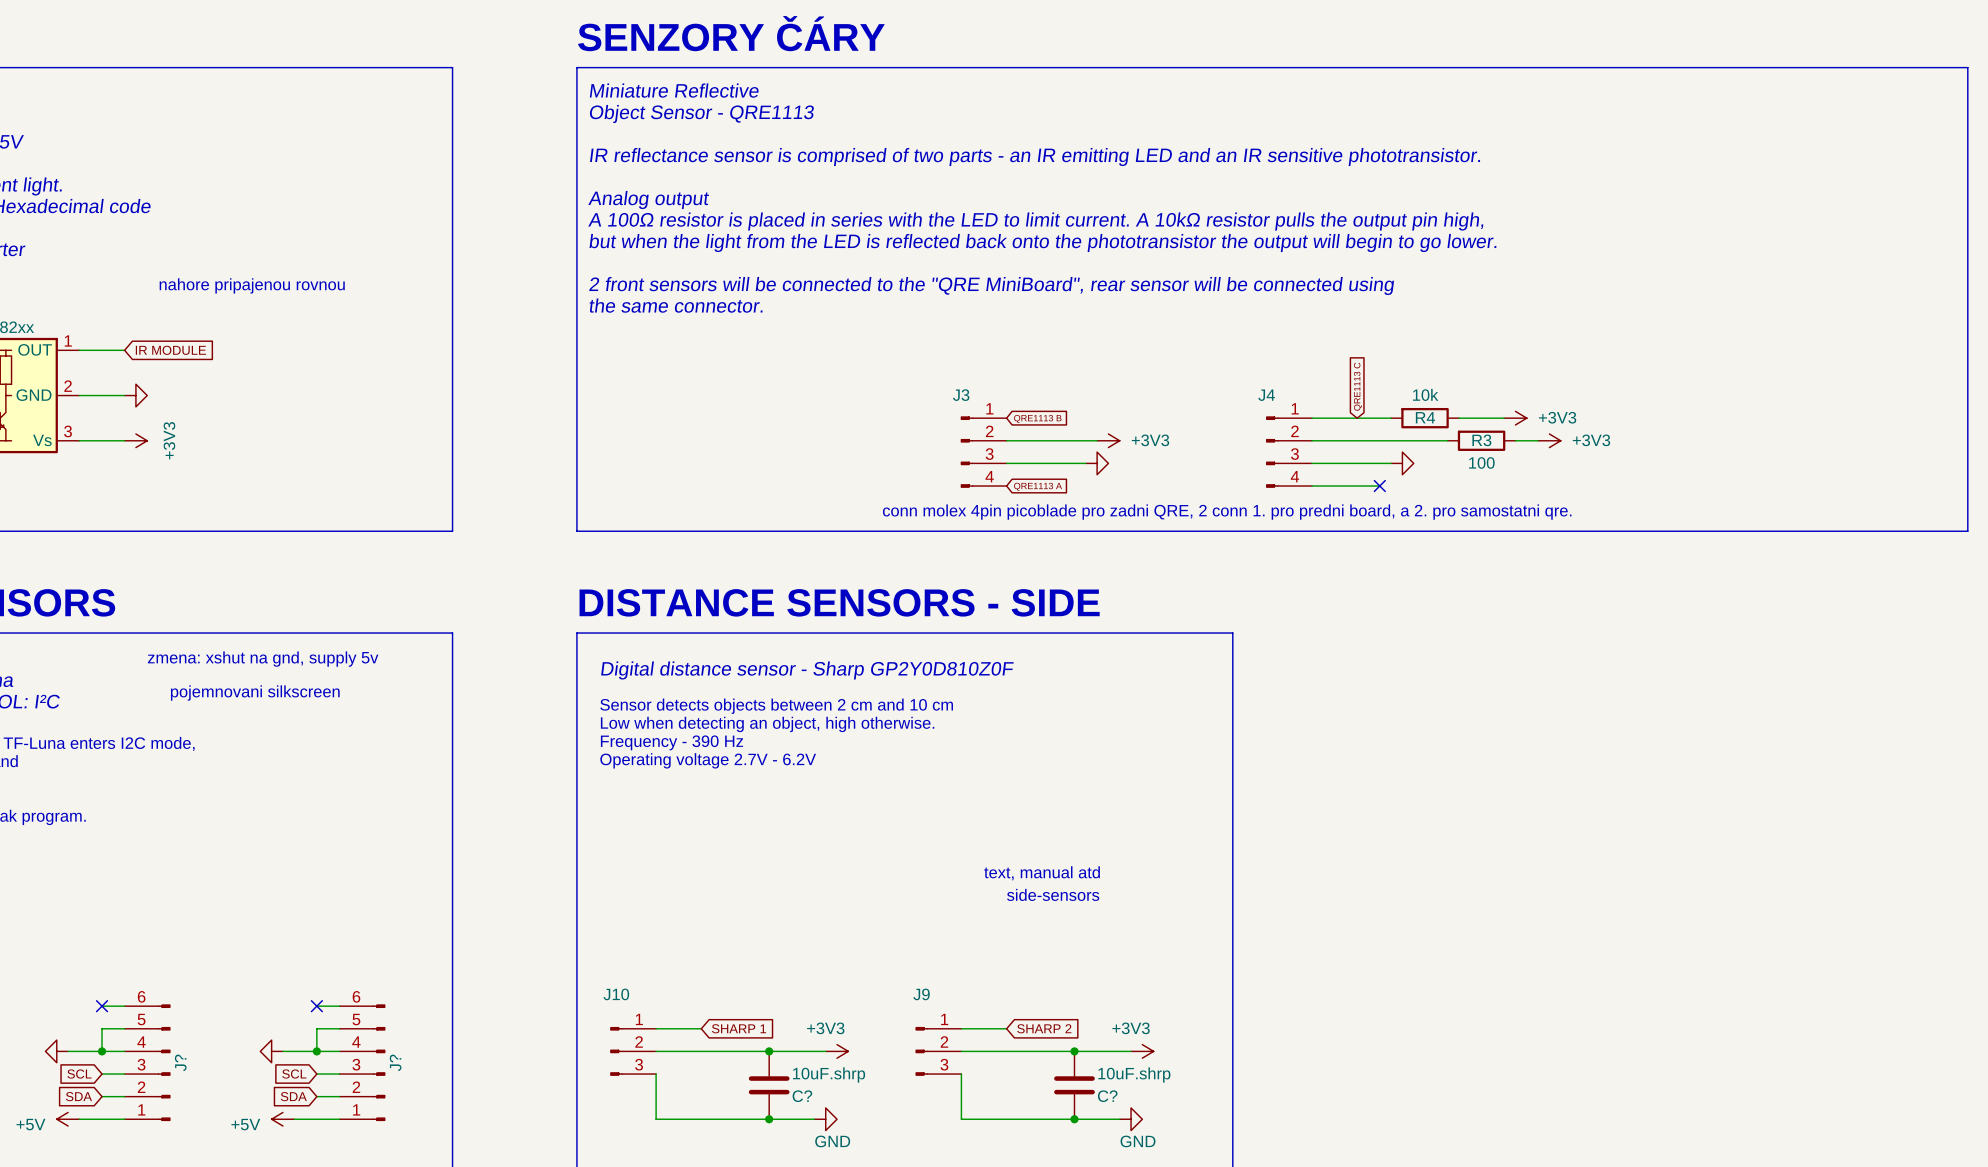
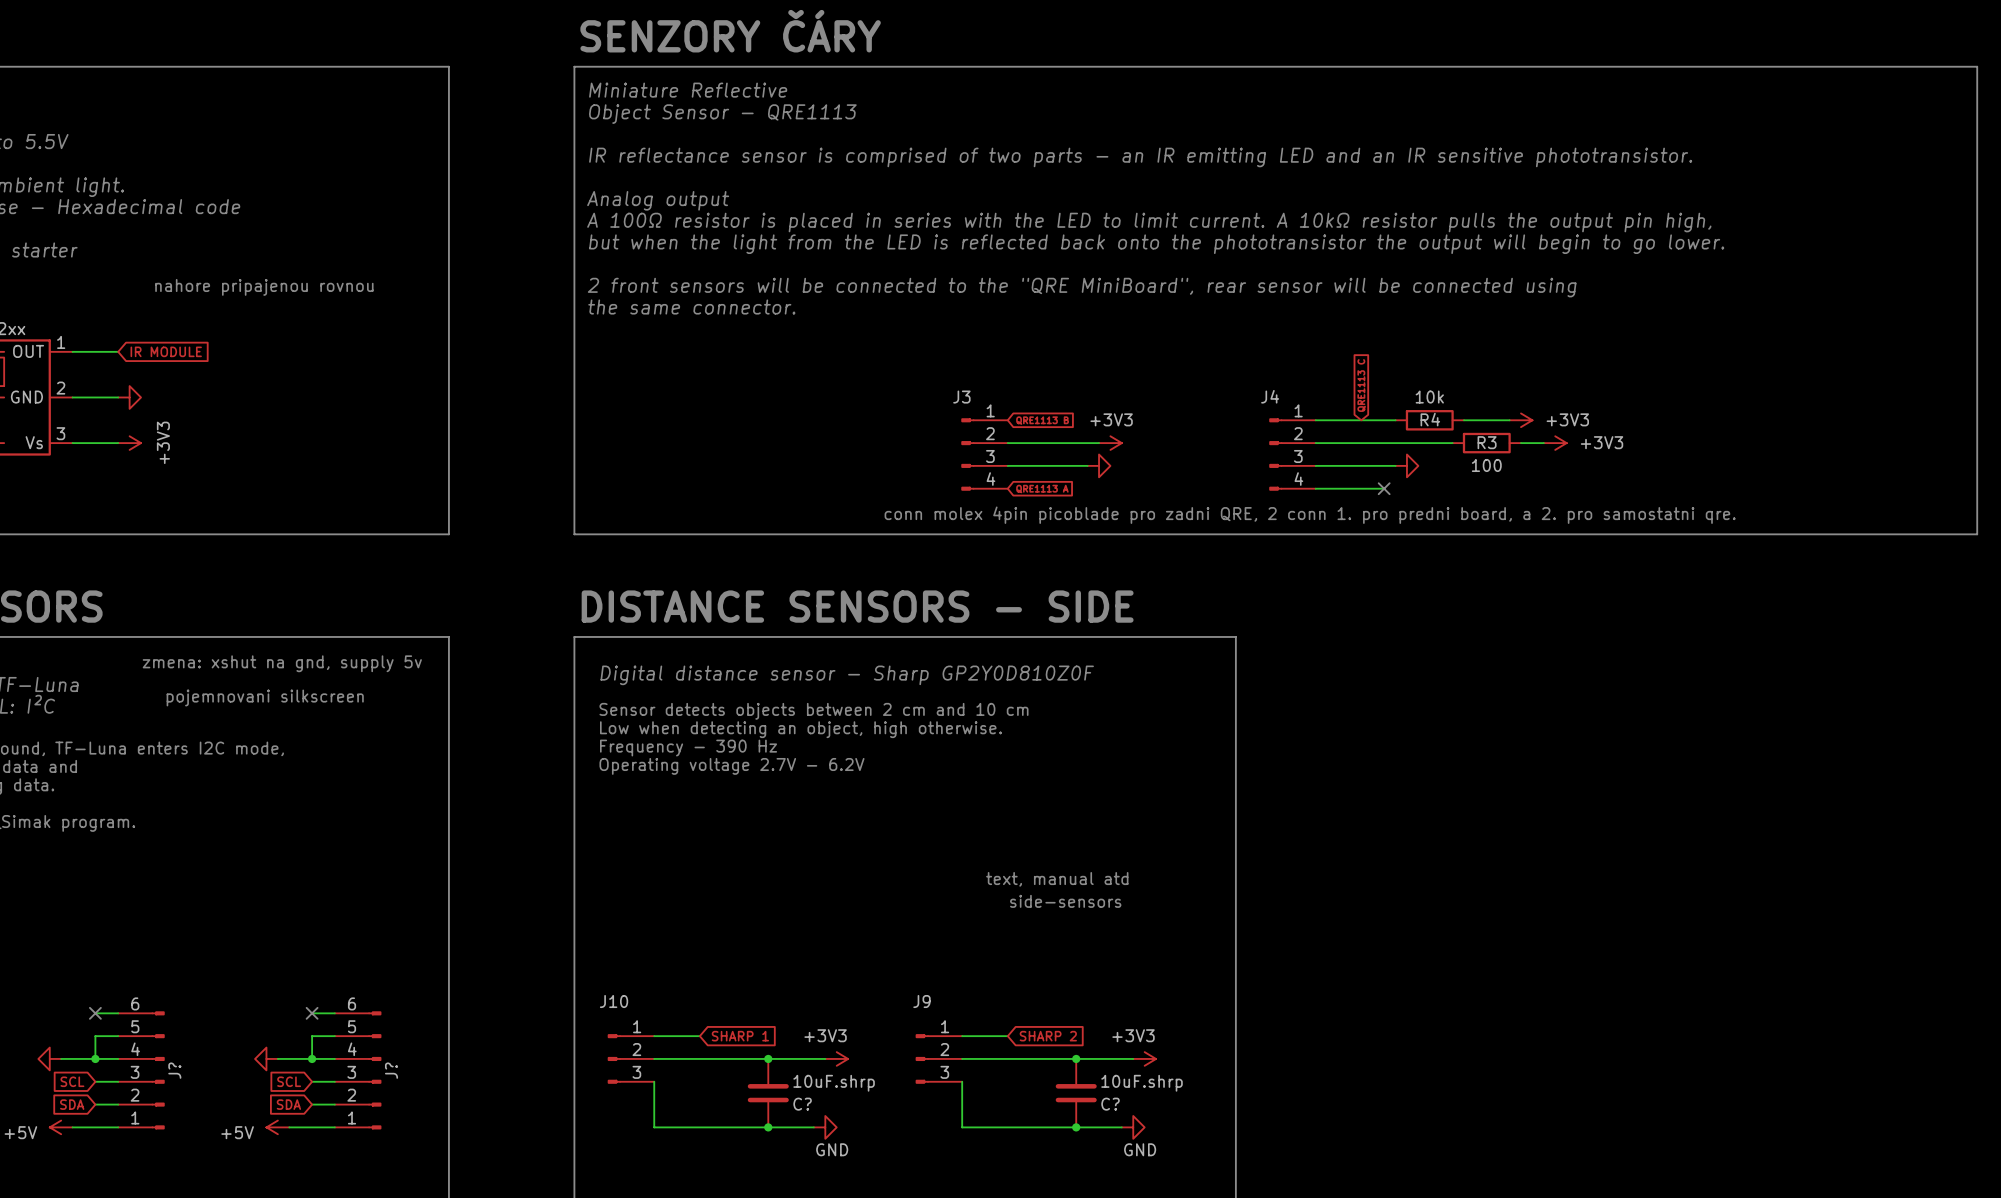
power symbol text position: +3V3 (1150, 440) -> +3V3 (1111, 419)

